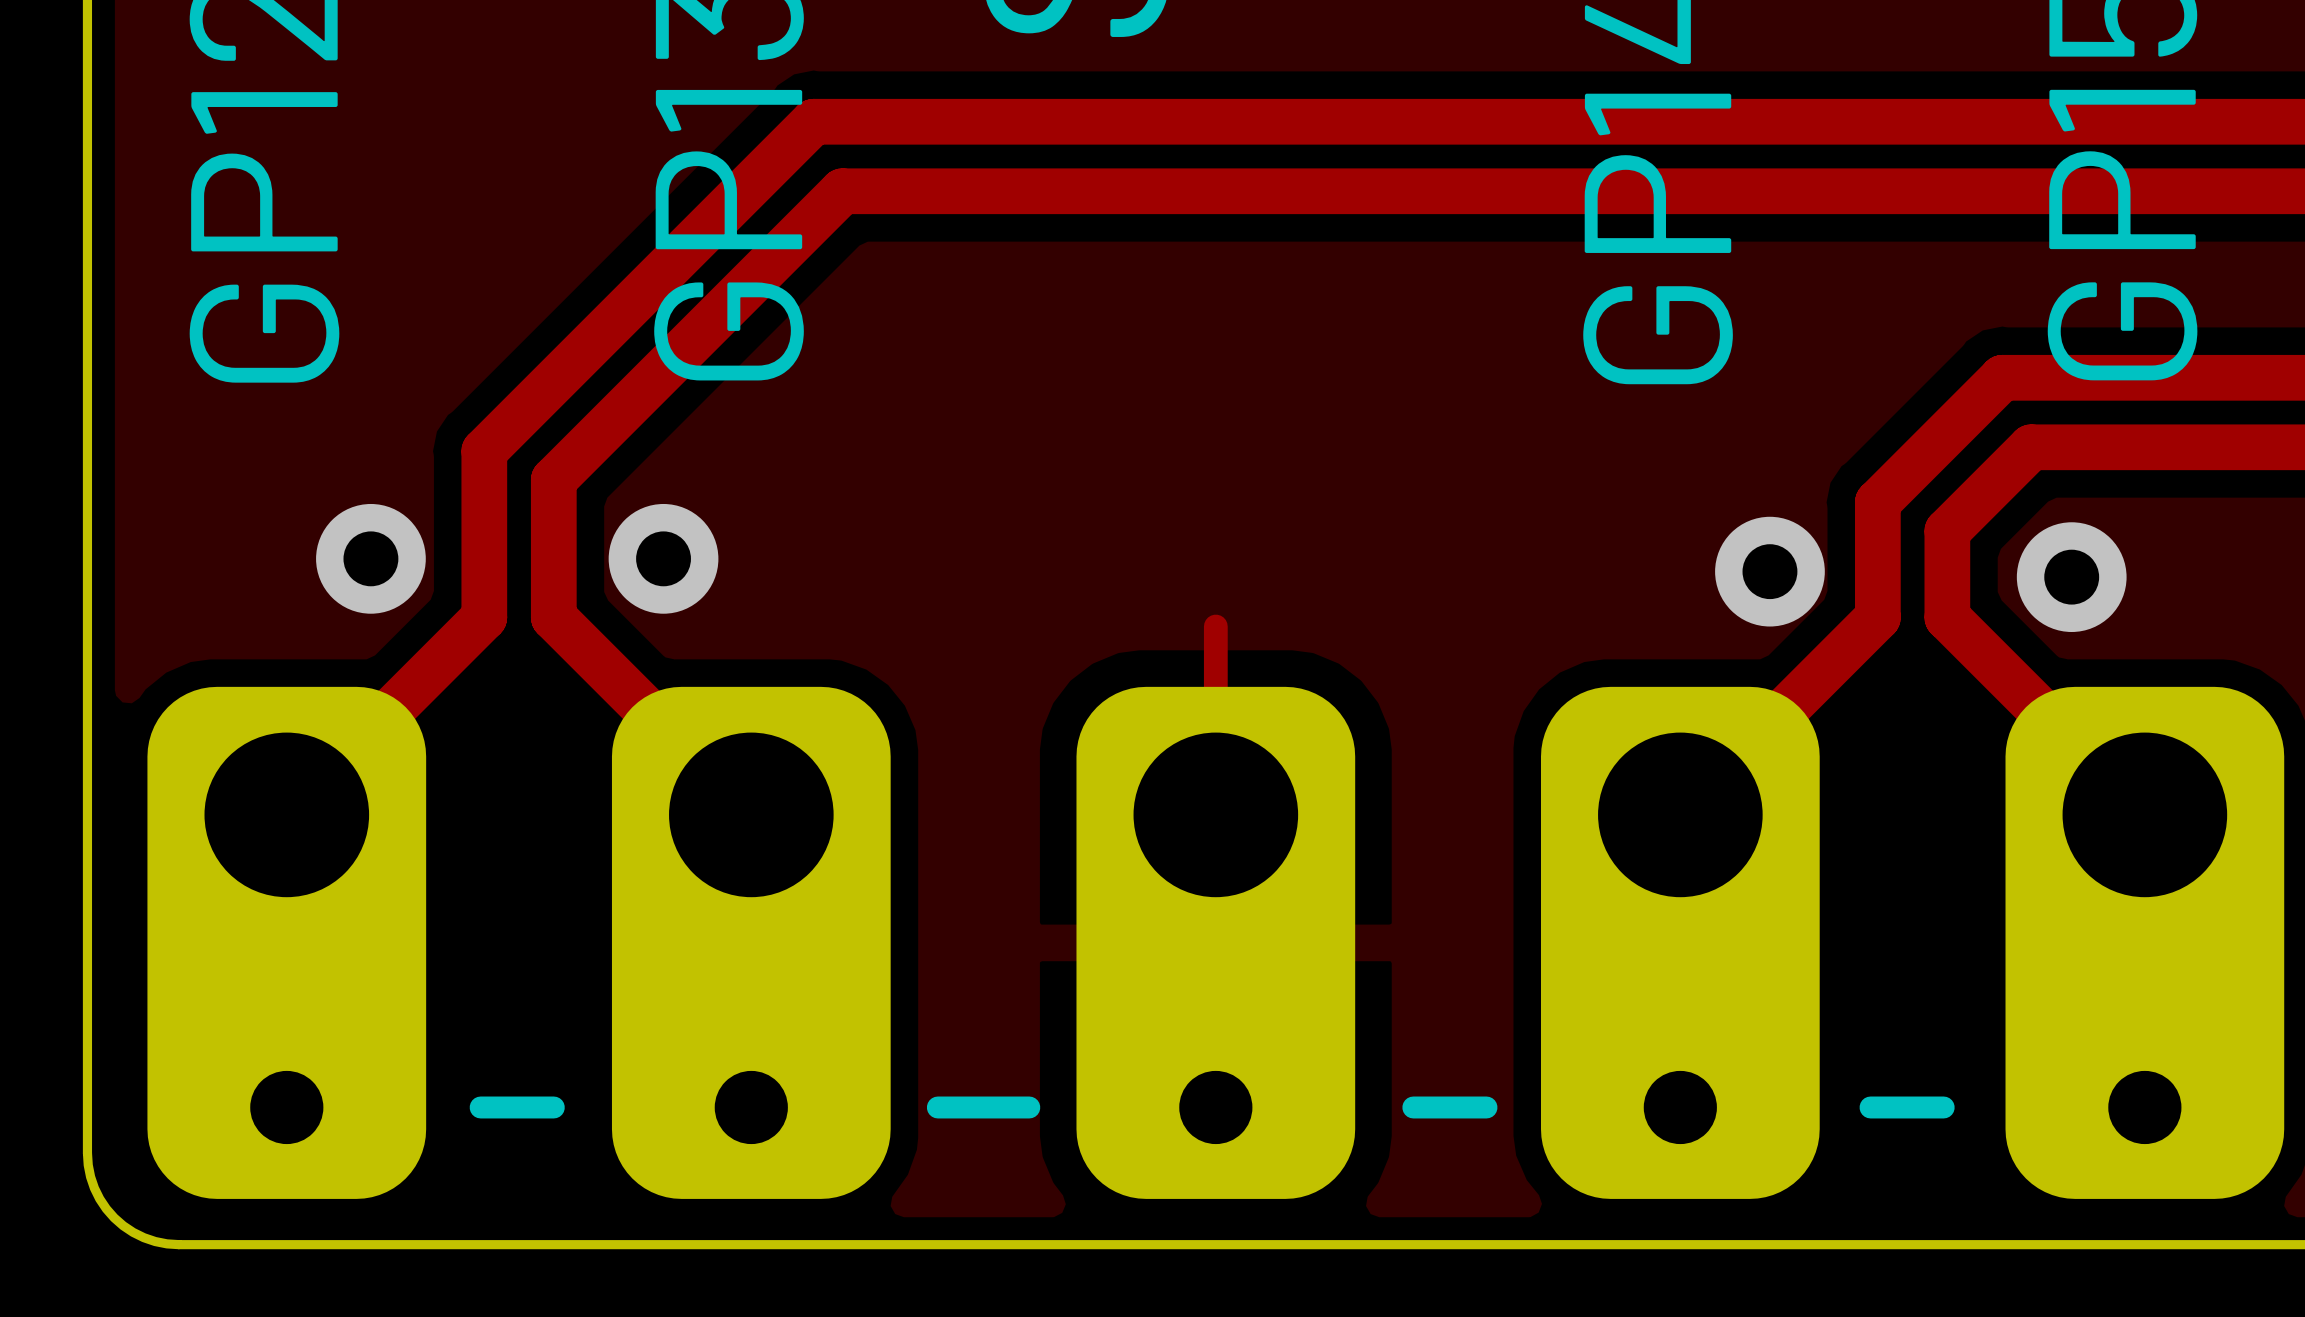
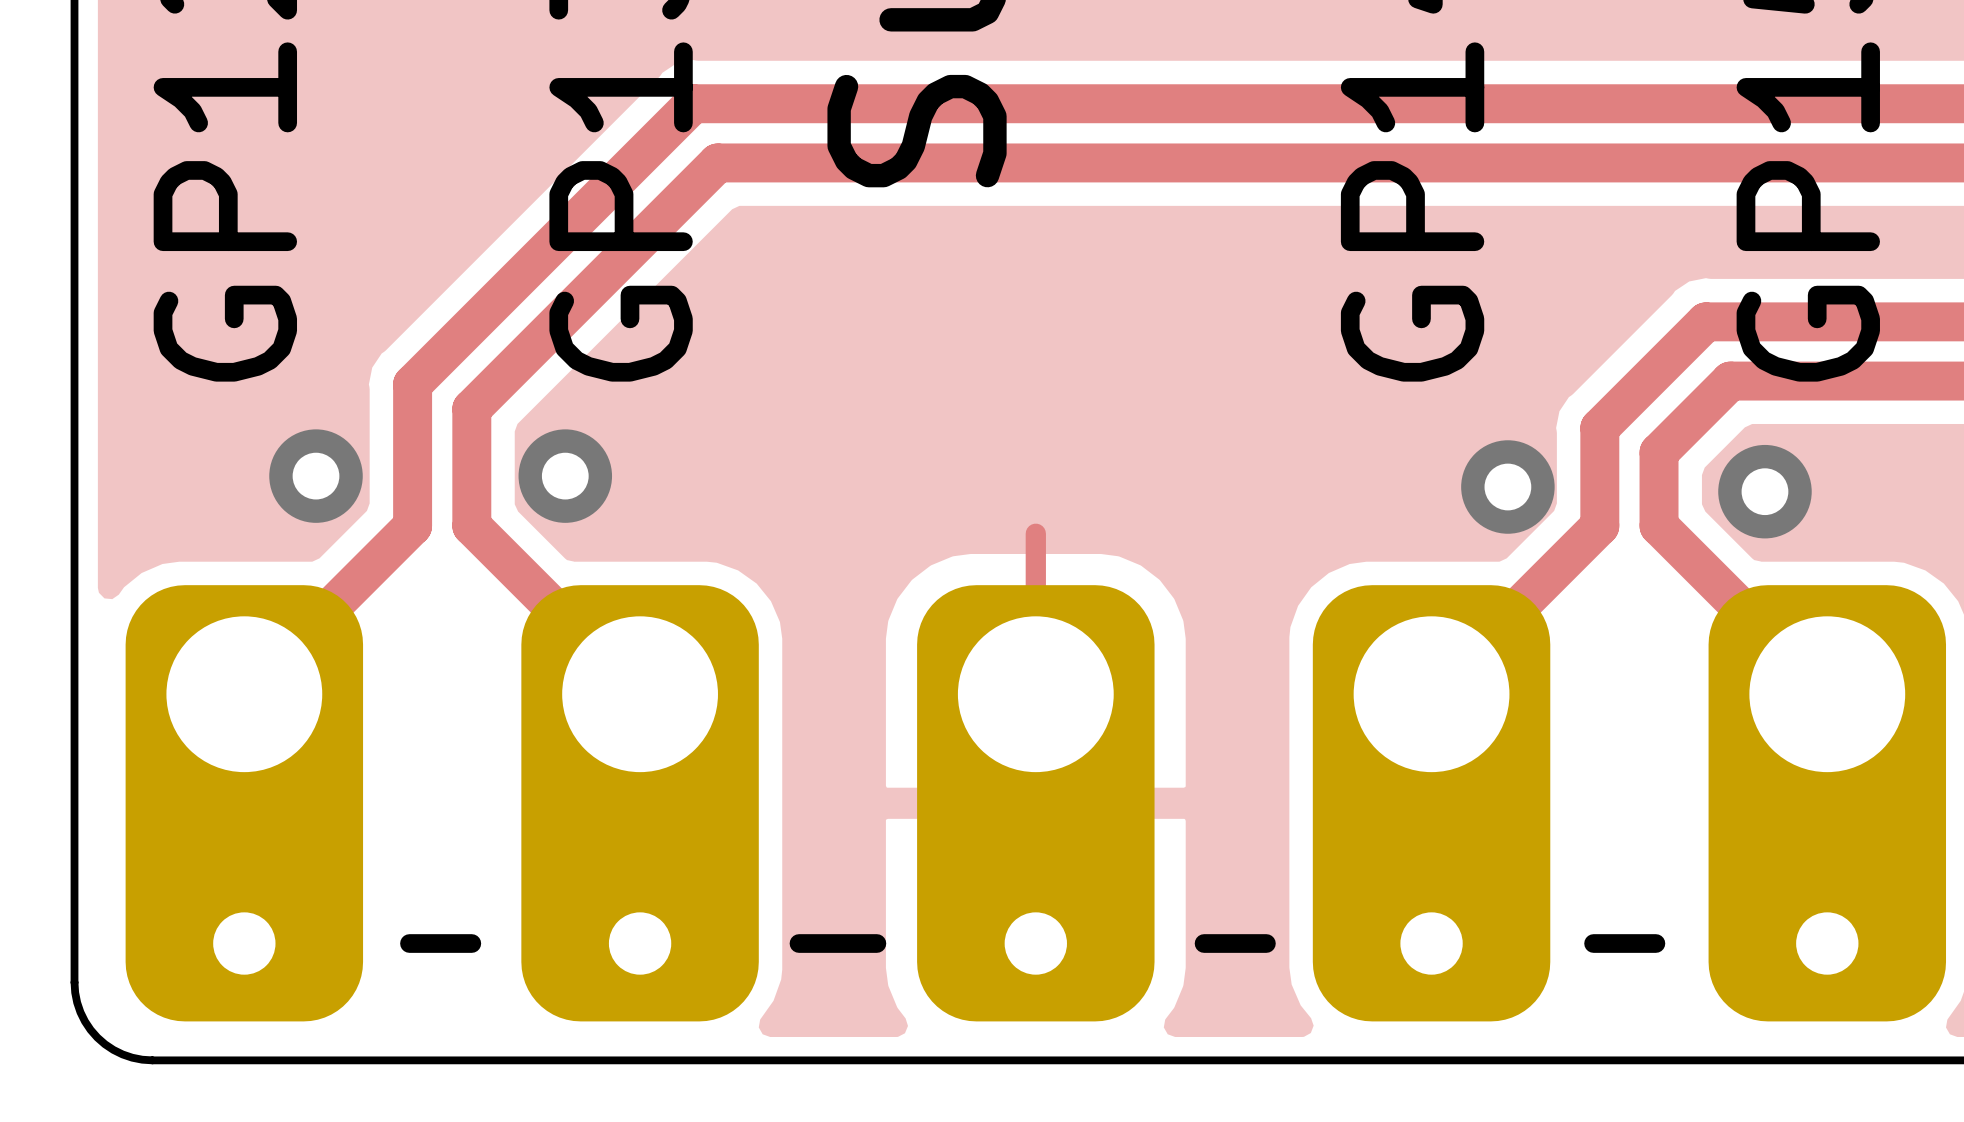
part footprint: [147, 686, 2285, 1199] -> [125, 585, 1947, 1022]

